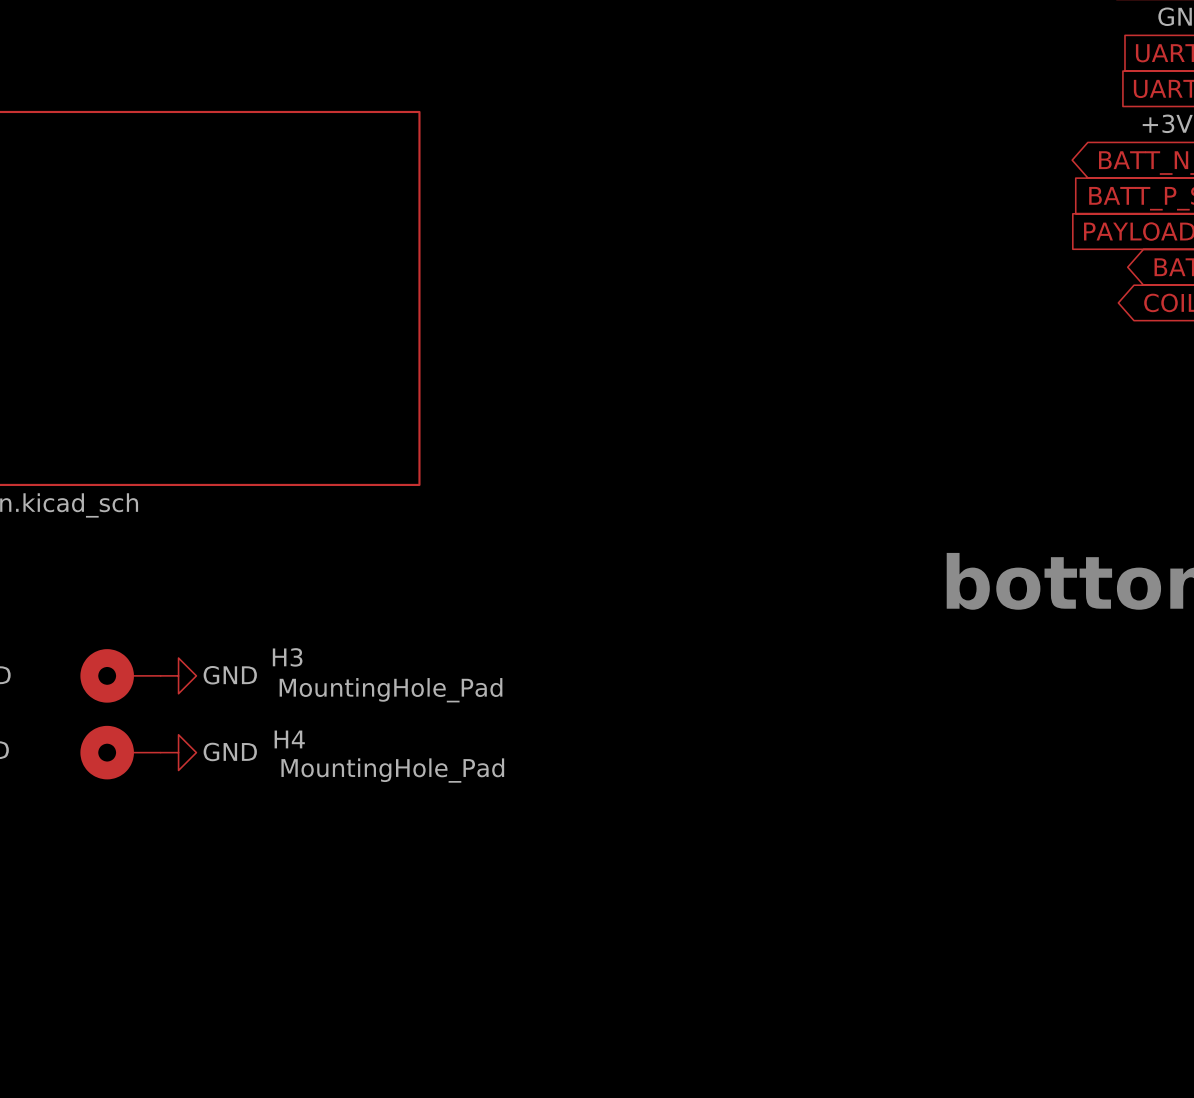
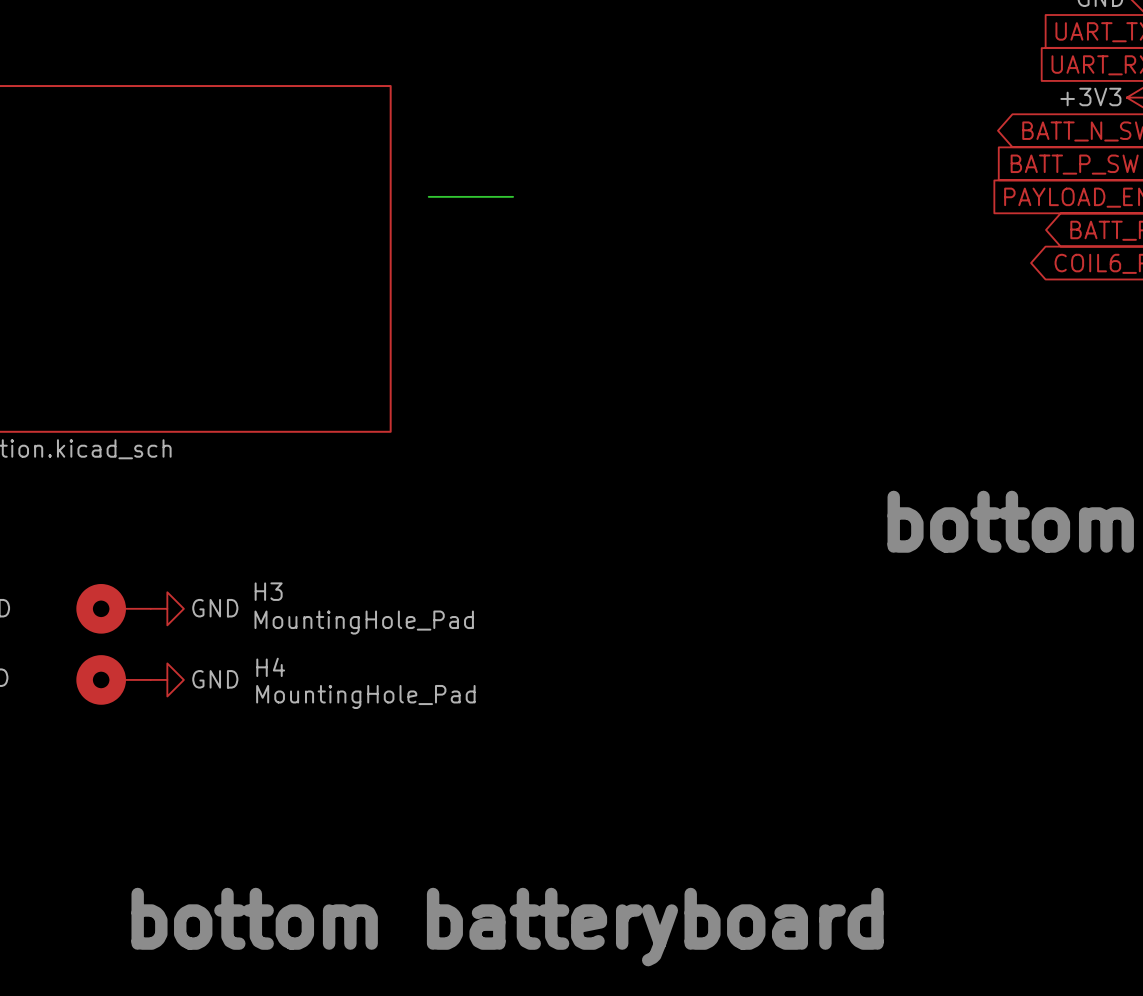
wire: none -> (428, 196) (513, 196)
text: none -> bottom batteryboard (507, 927)

